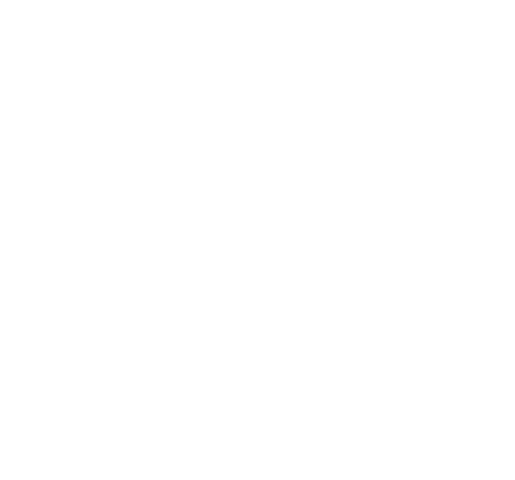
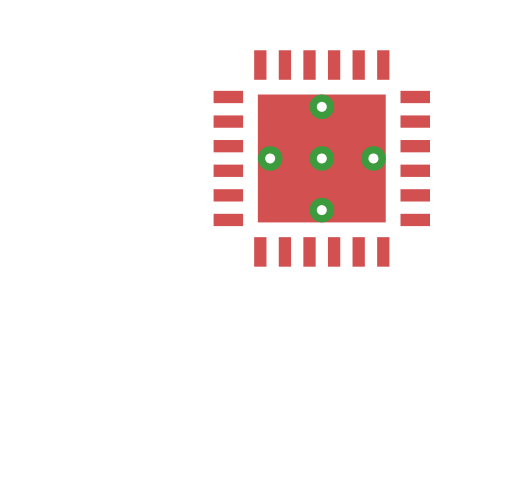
part: none -> (321, 158)

